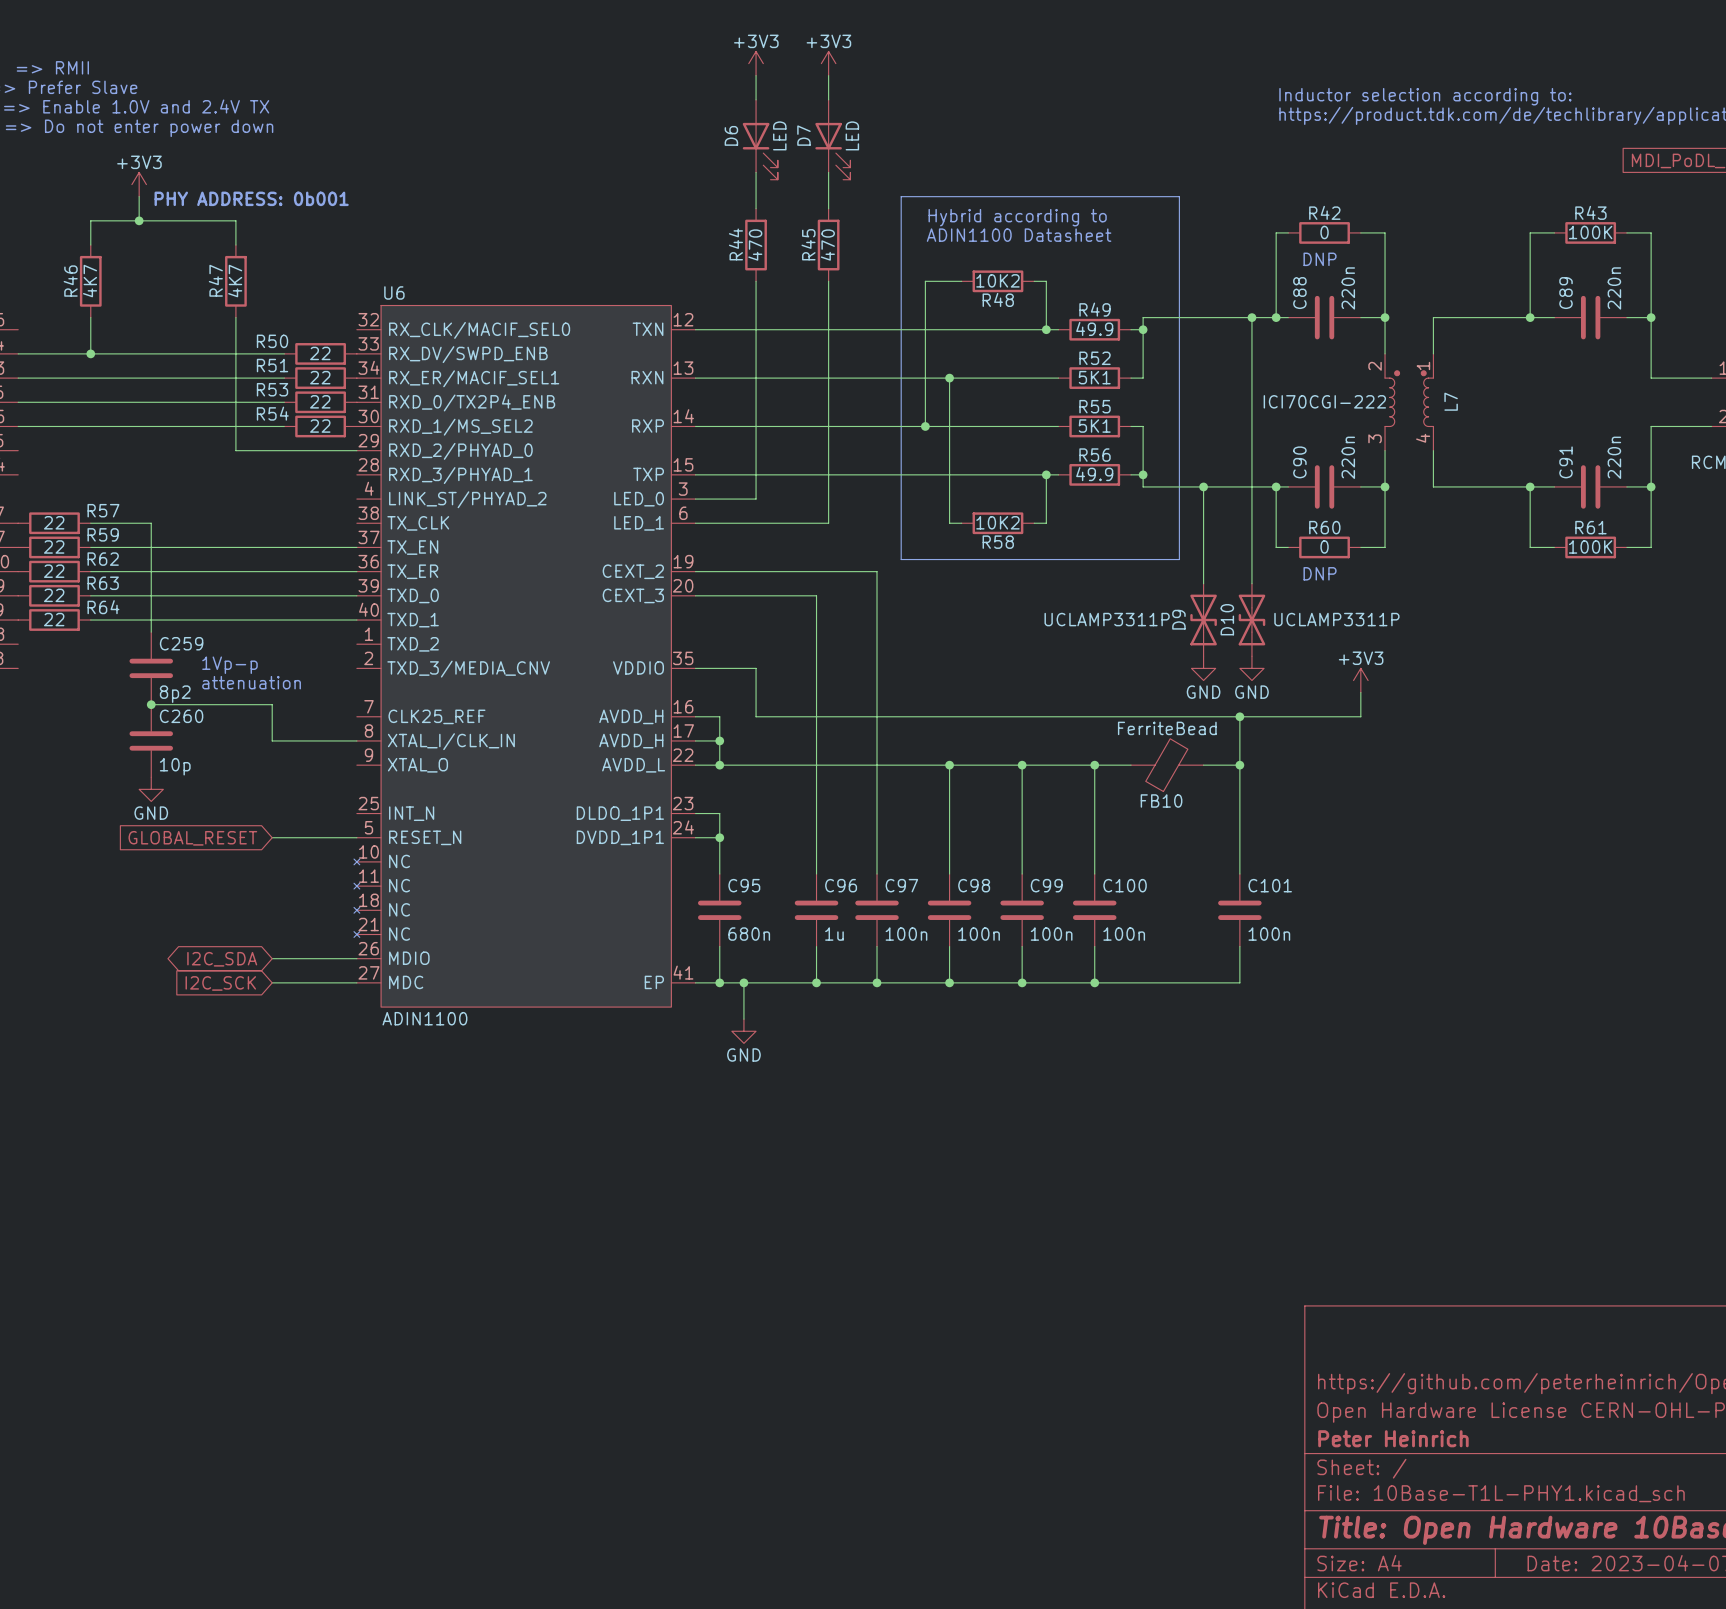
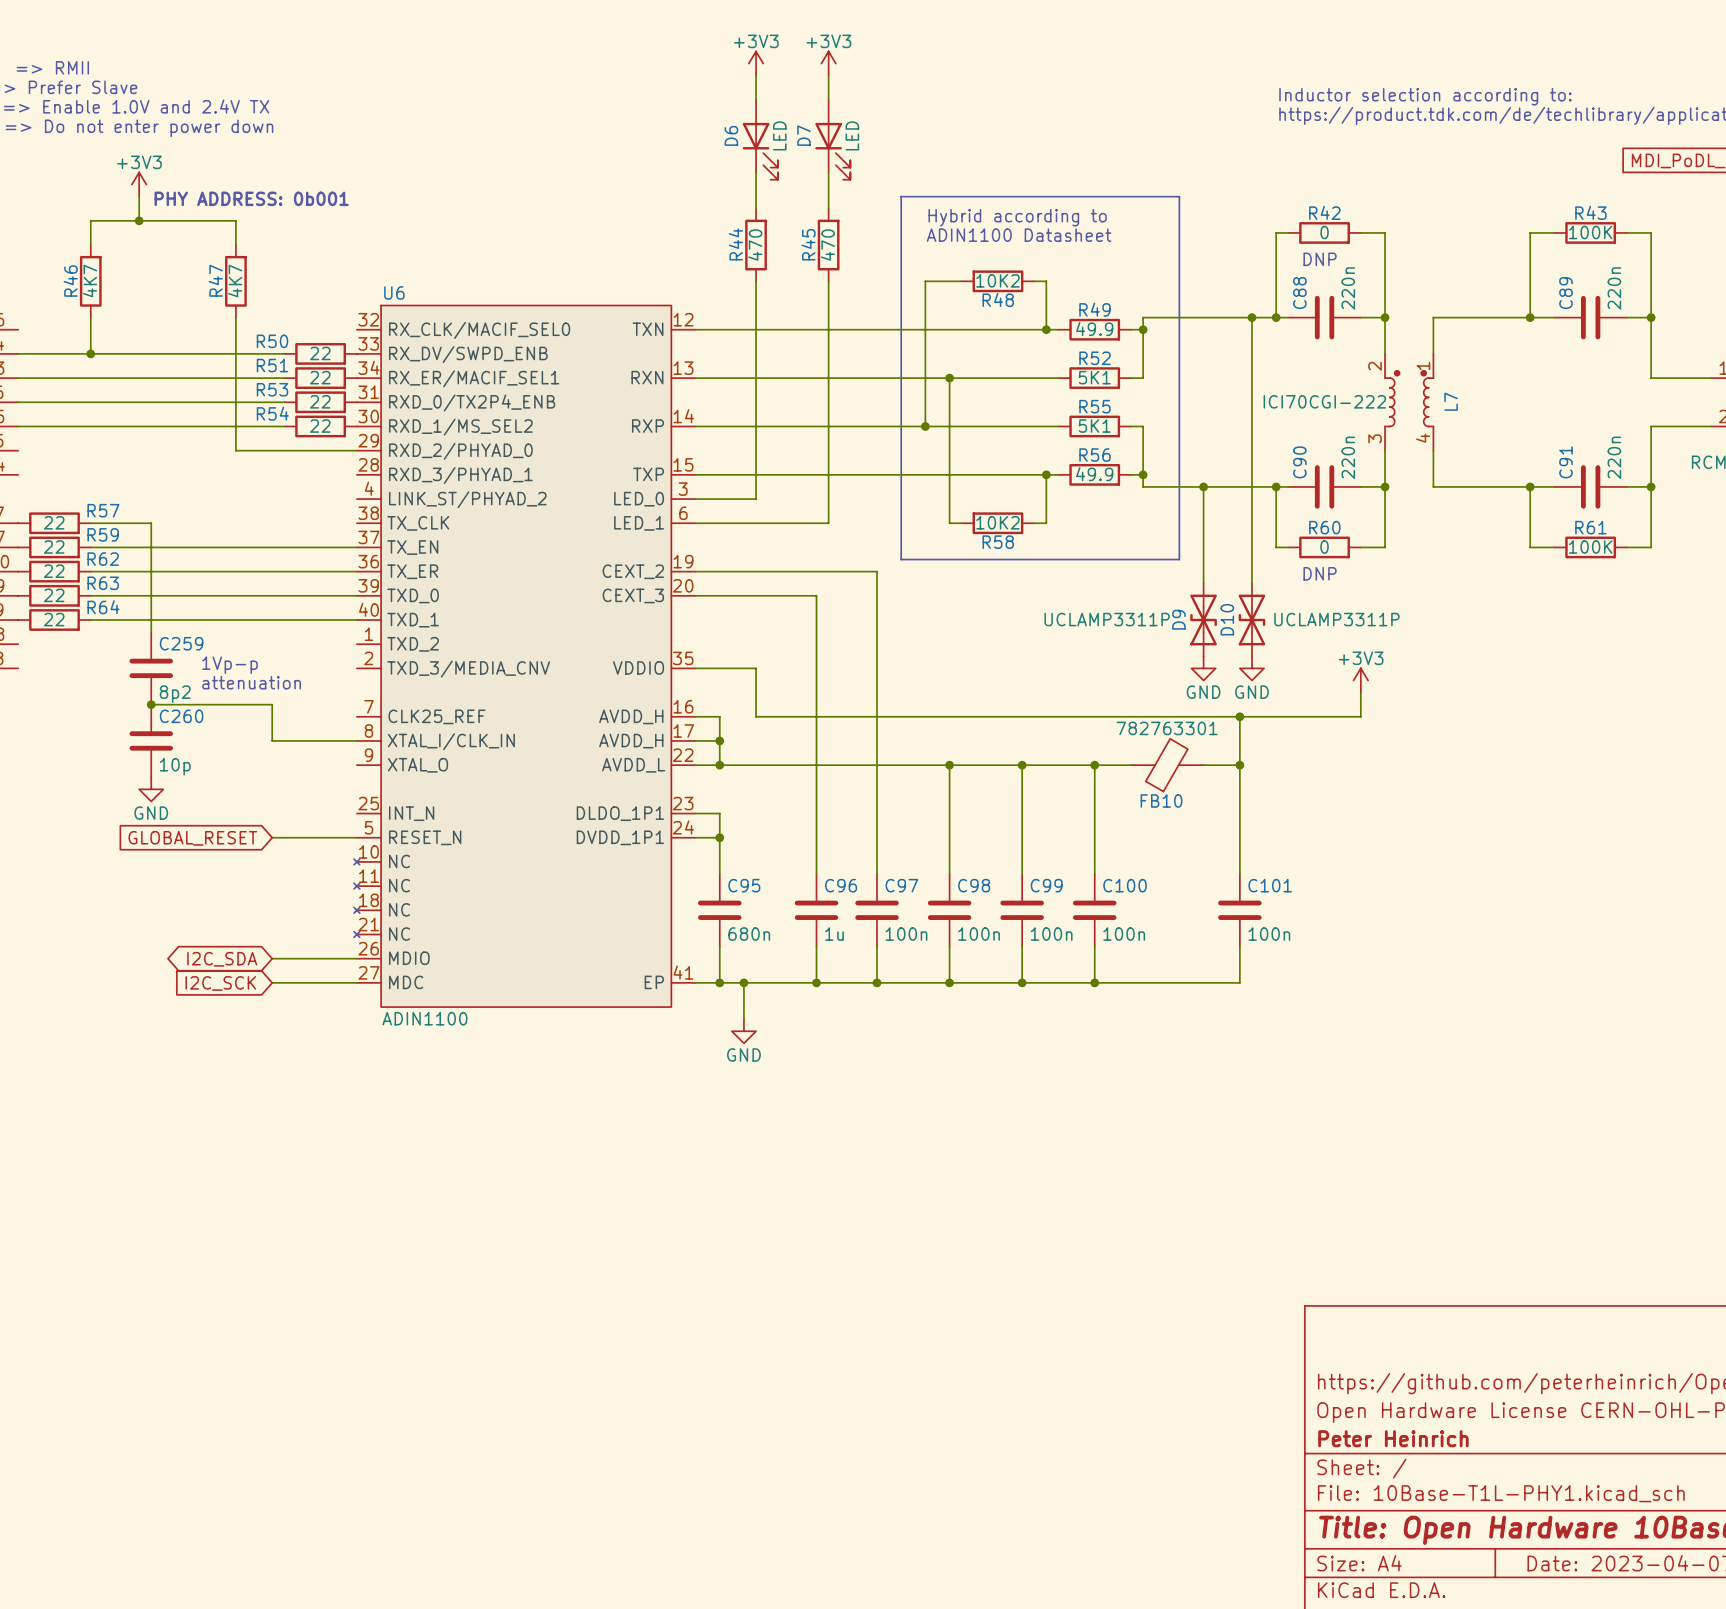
FB10 value: FerriteBead (1167, 728) -> 782763301 (1167, 728)

